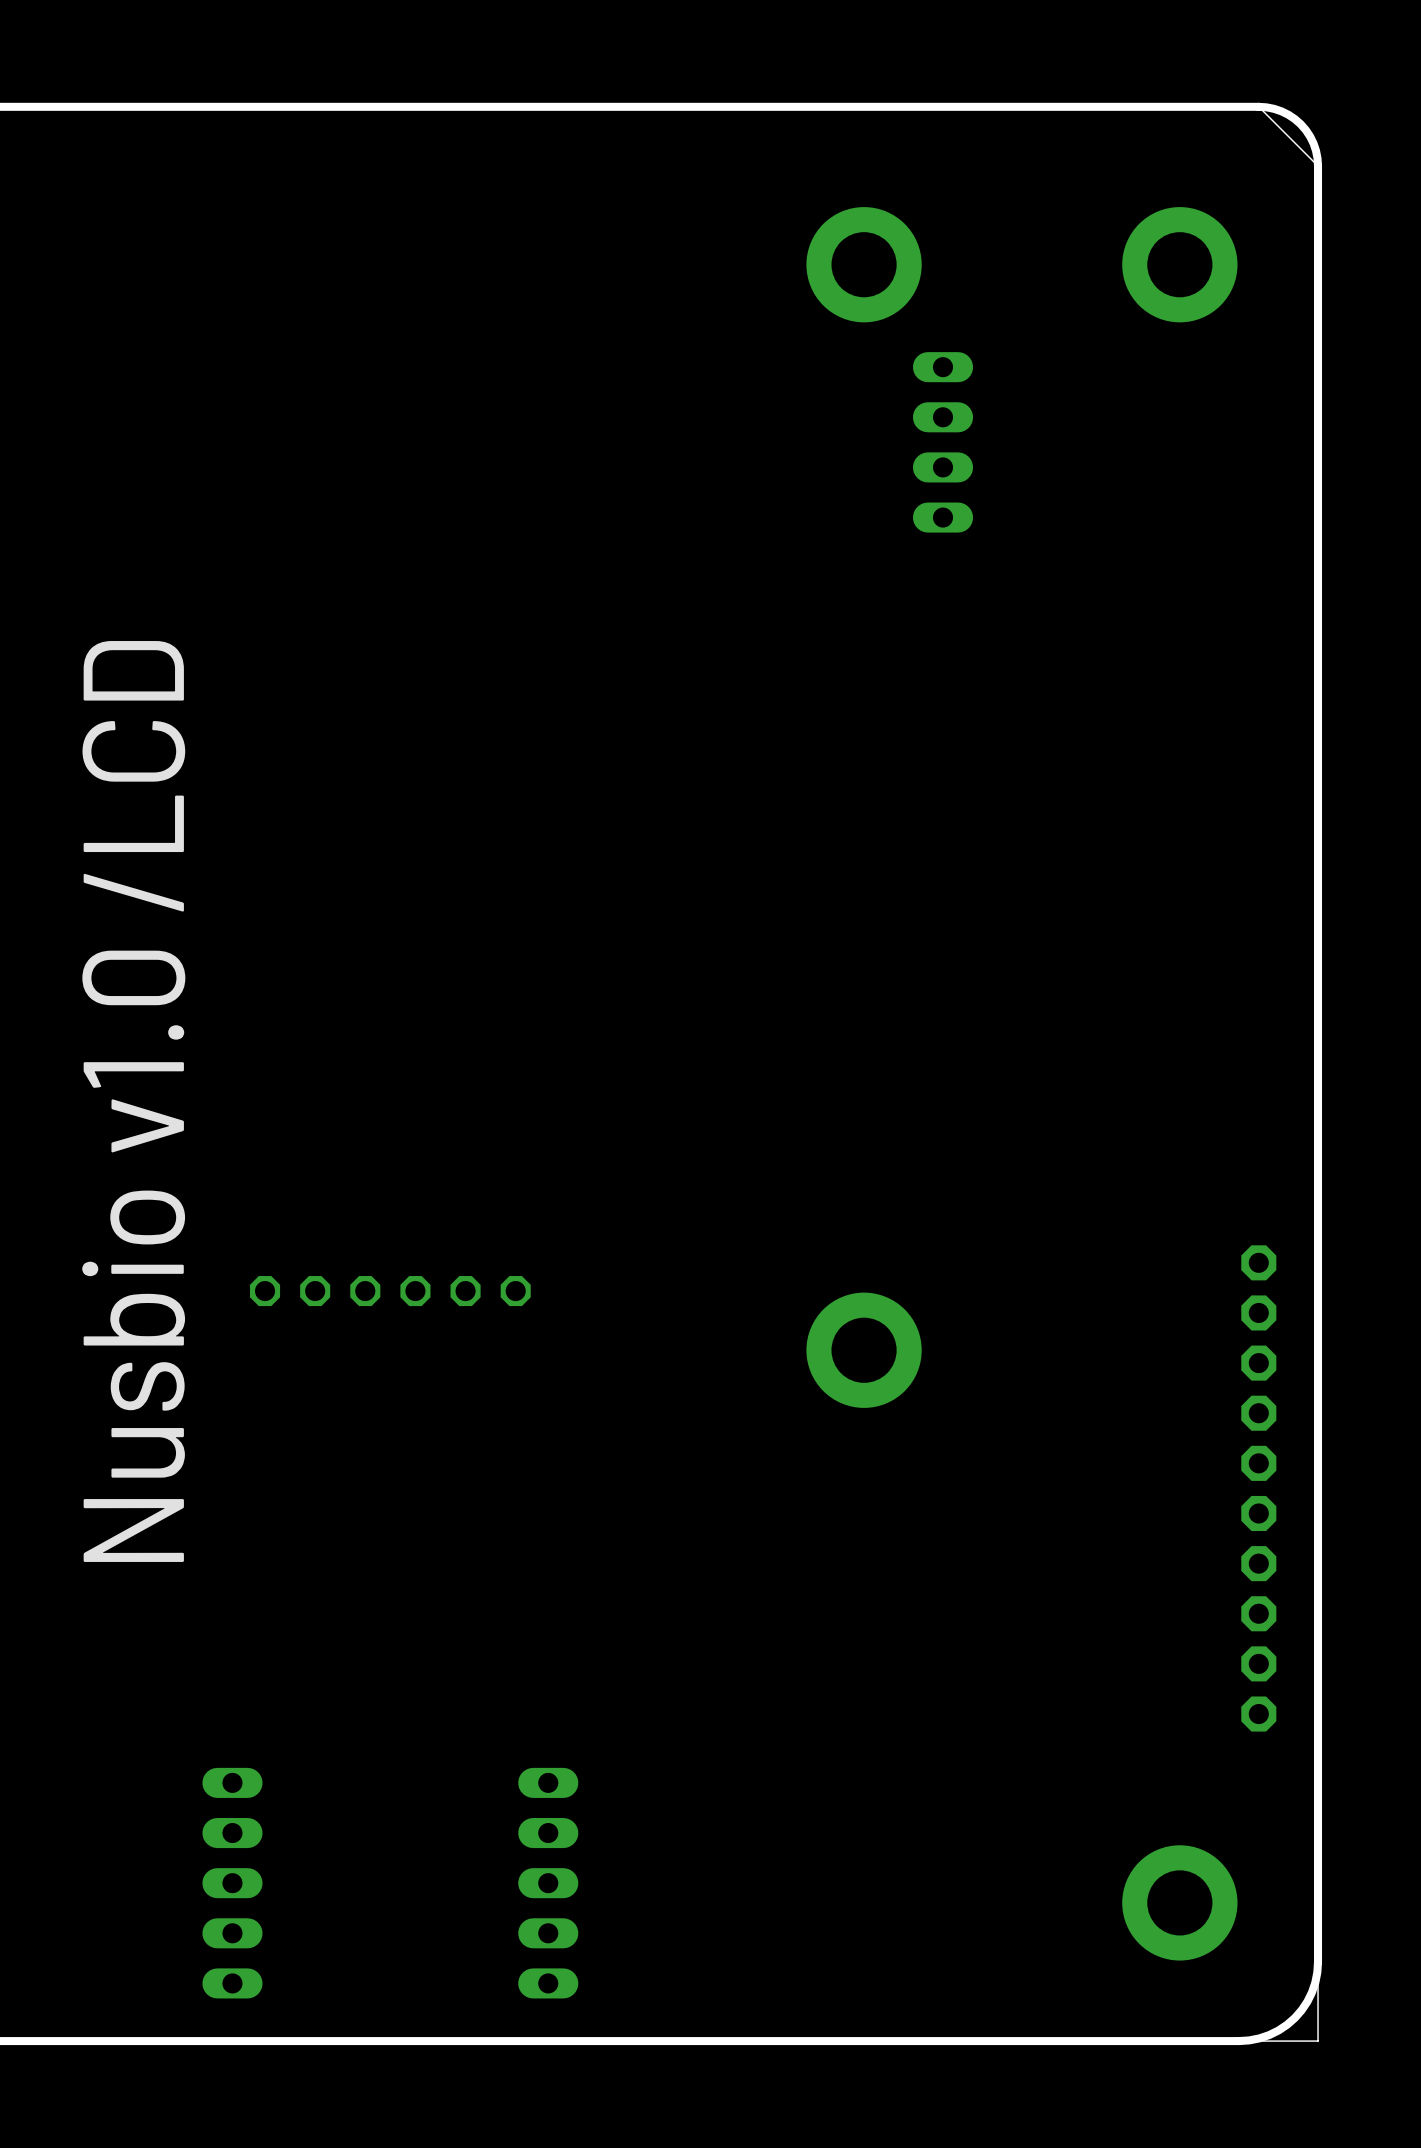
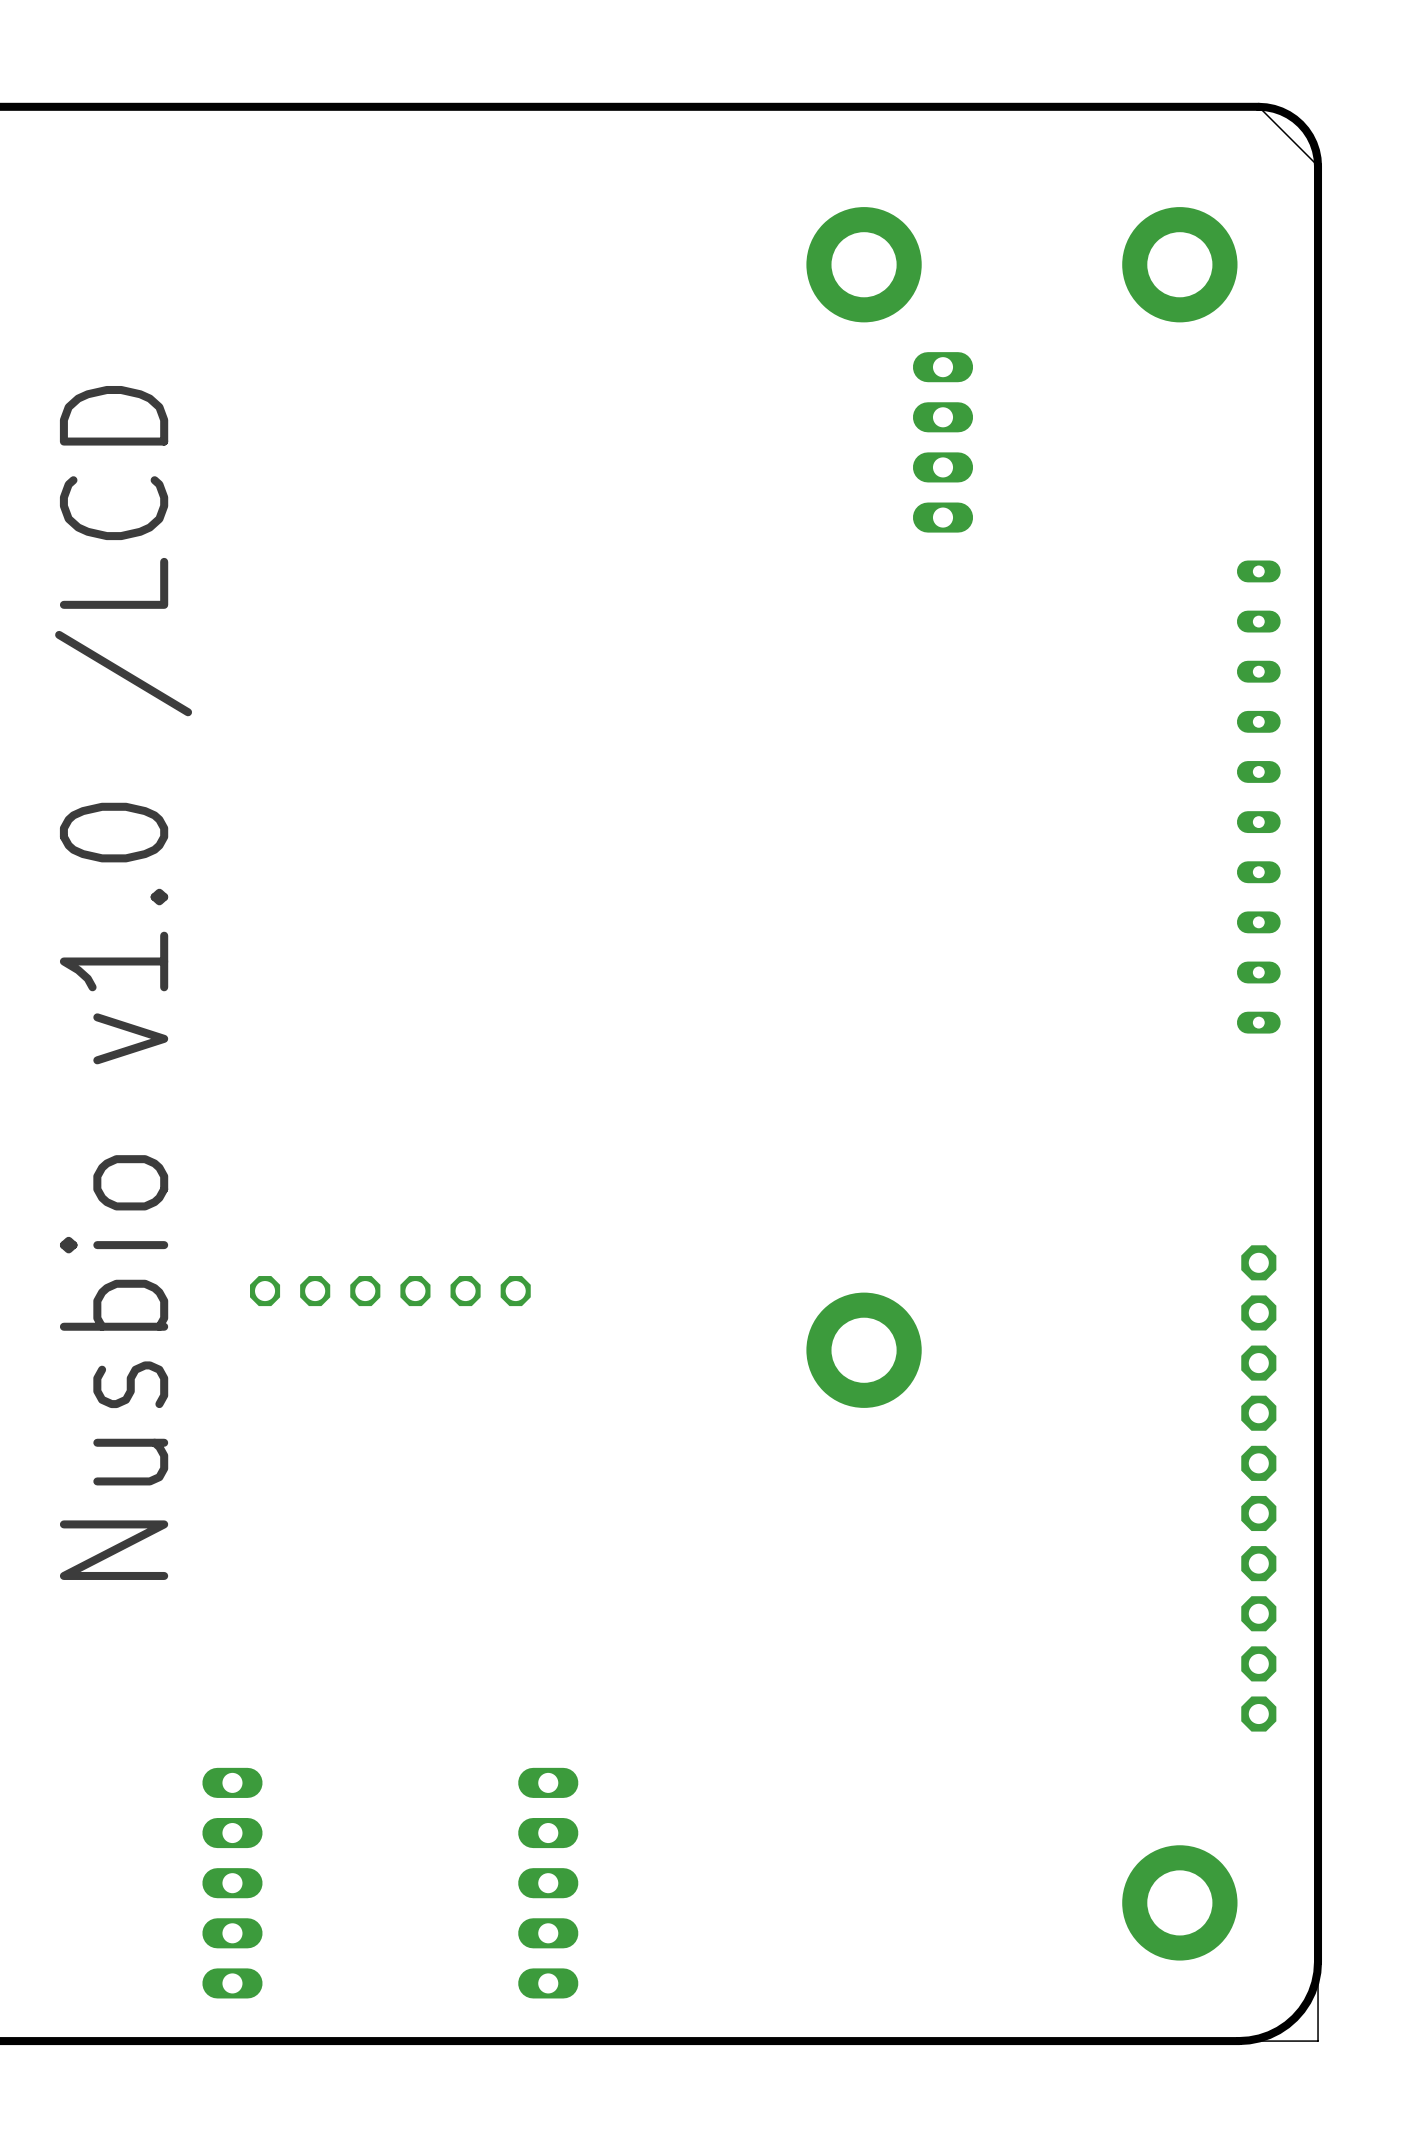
part: none -> (1258, 797)
text position: Nusbio v1.0 /LCD (133, 1101) -> Nusbio v1.0 /LCD (123, 982)

